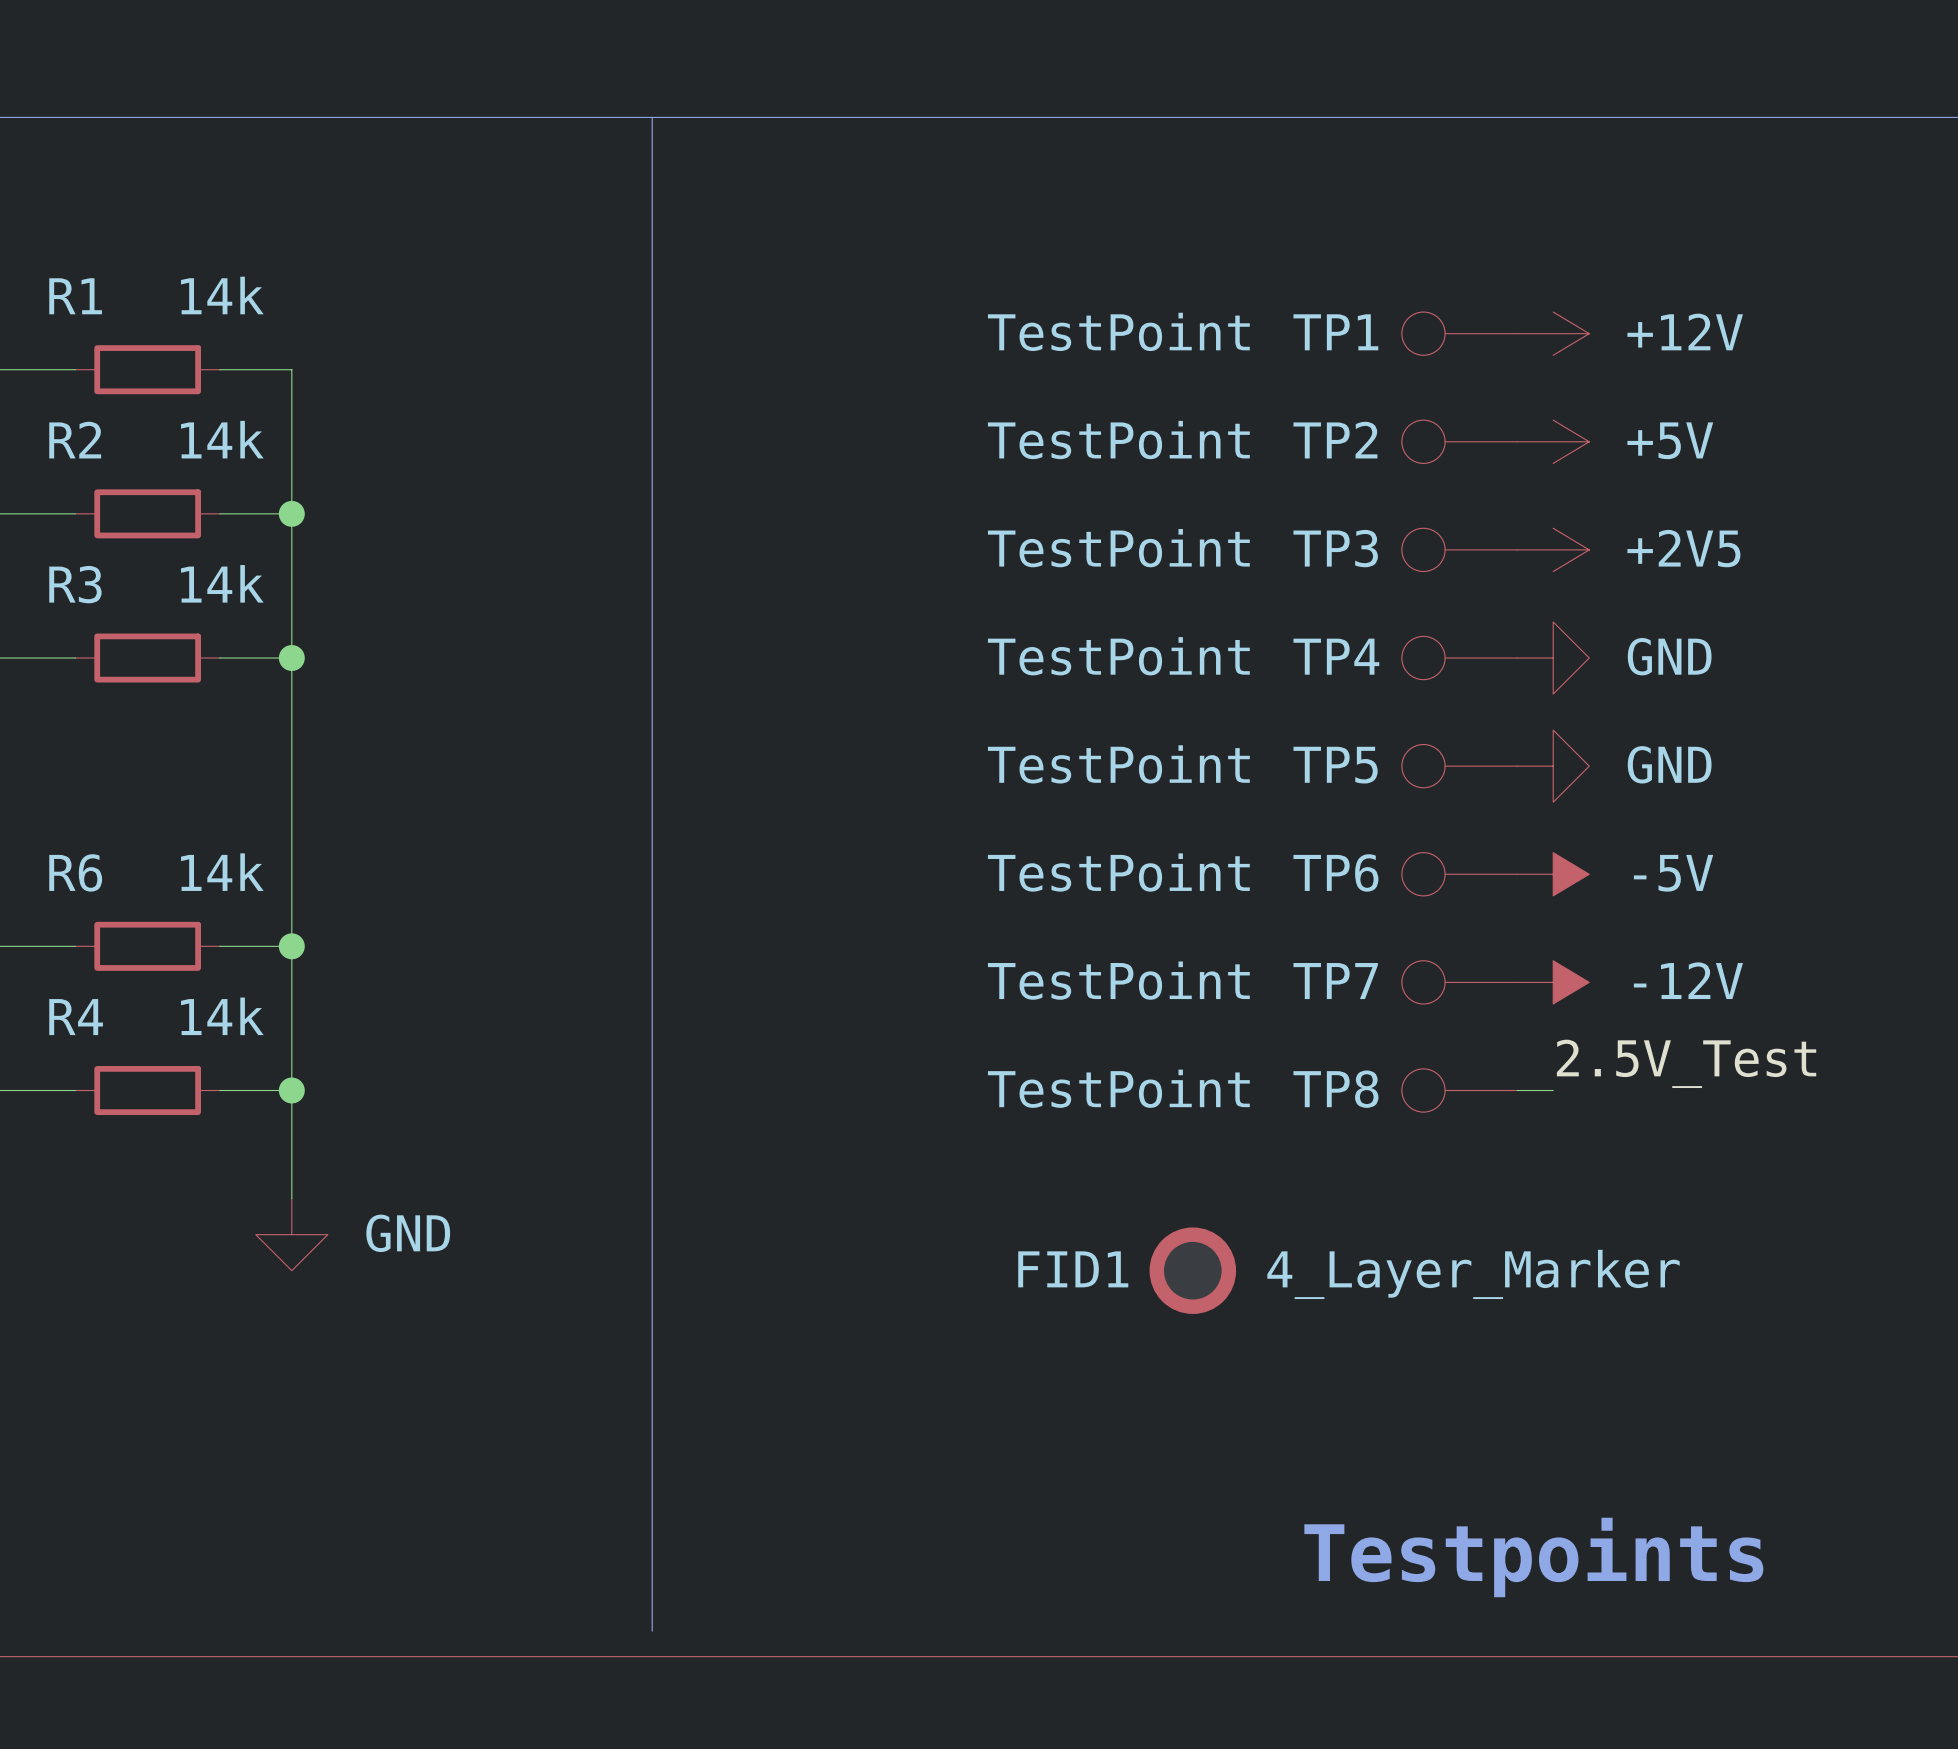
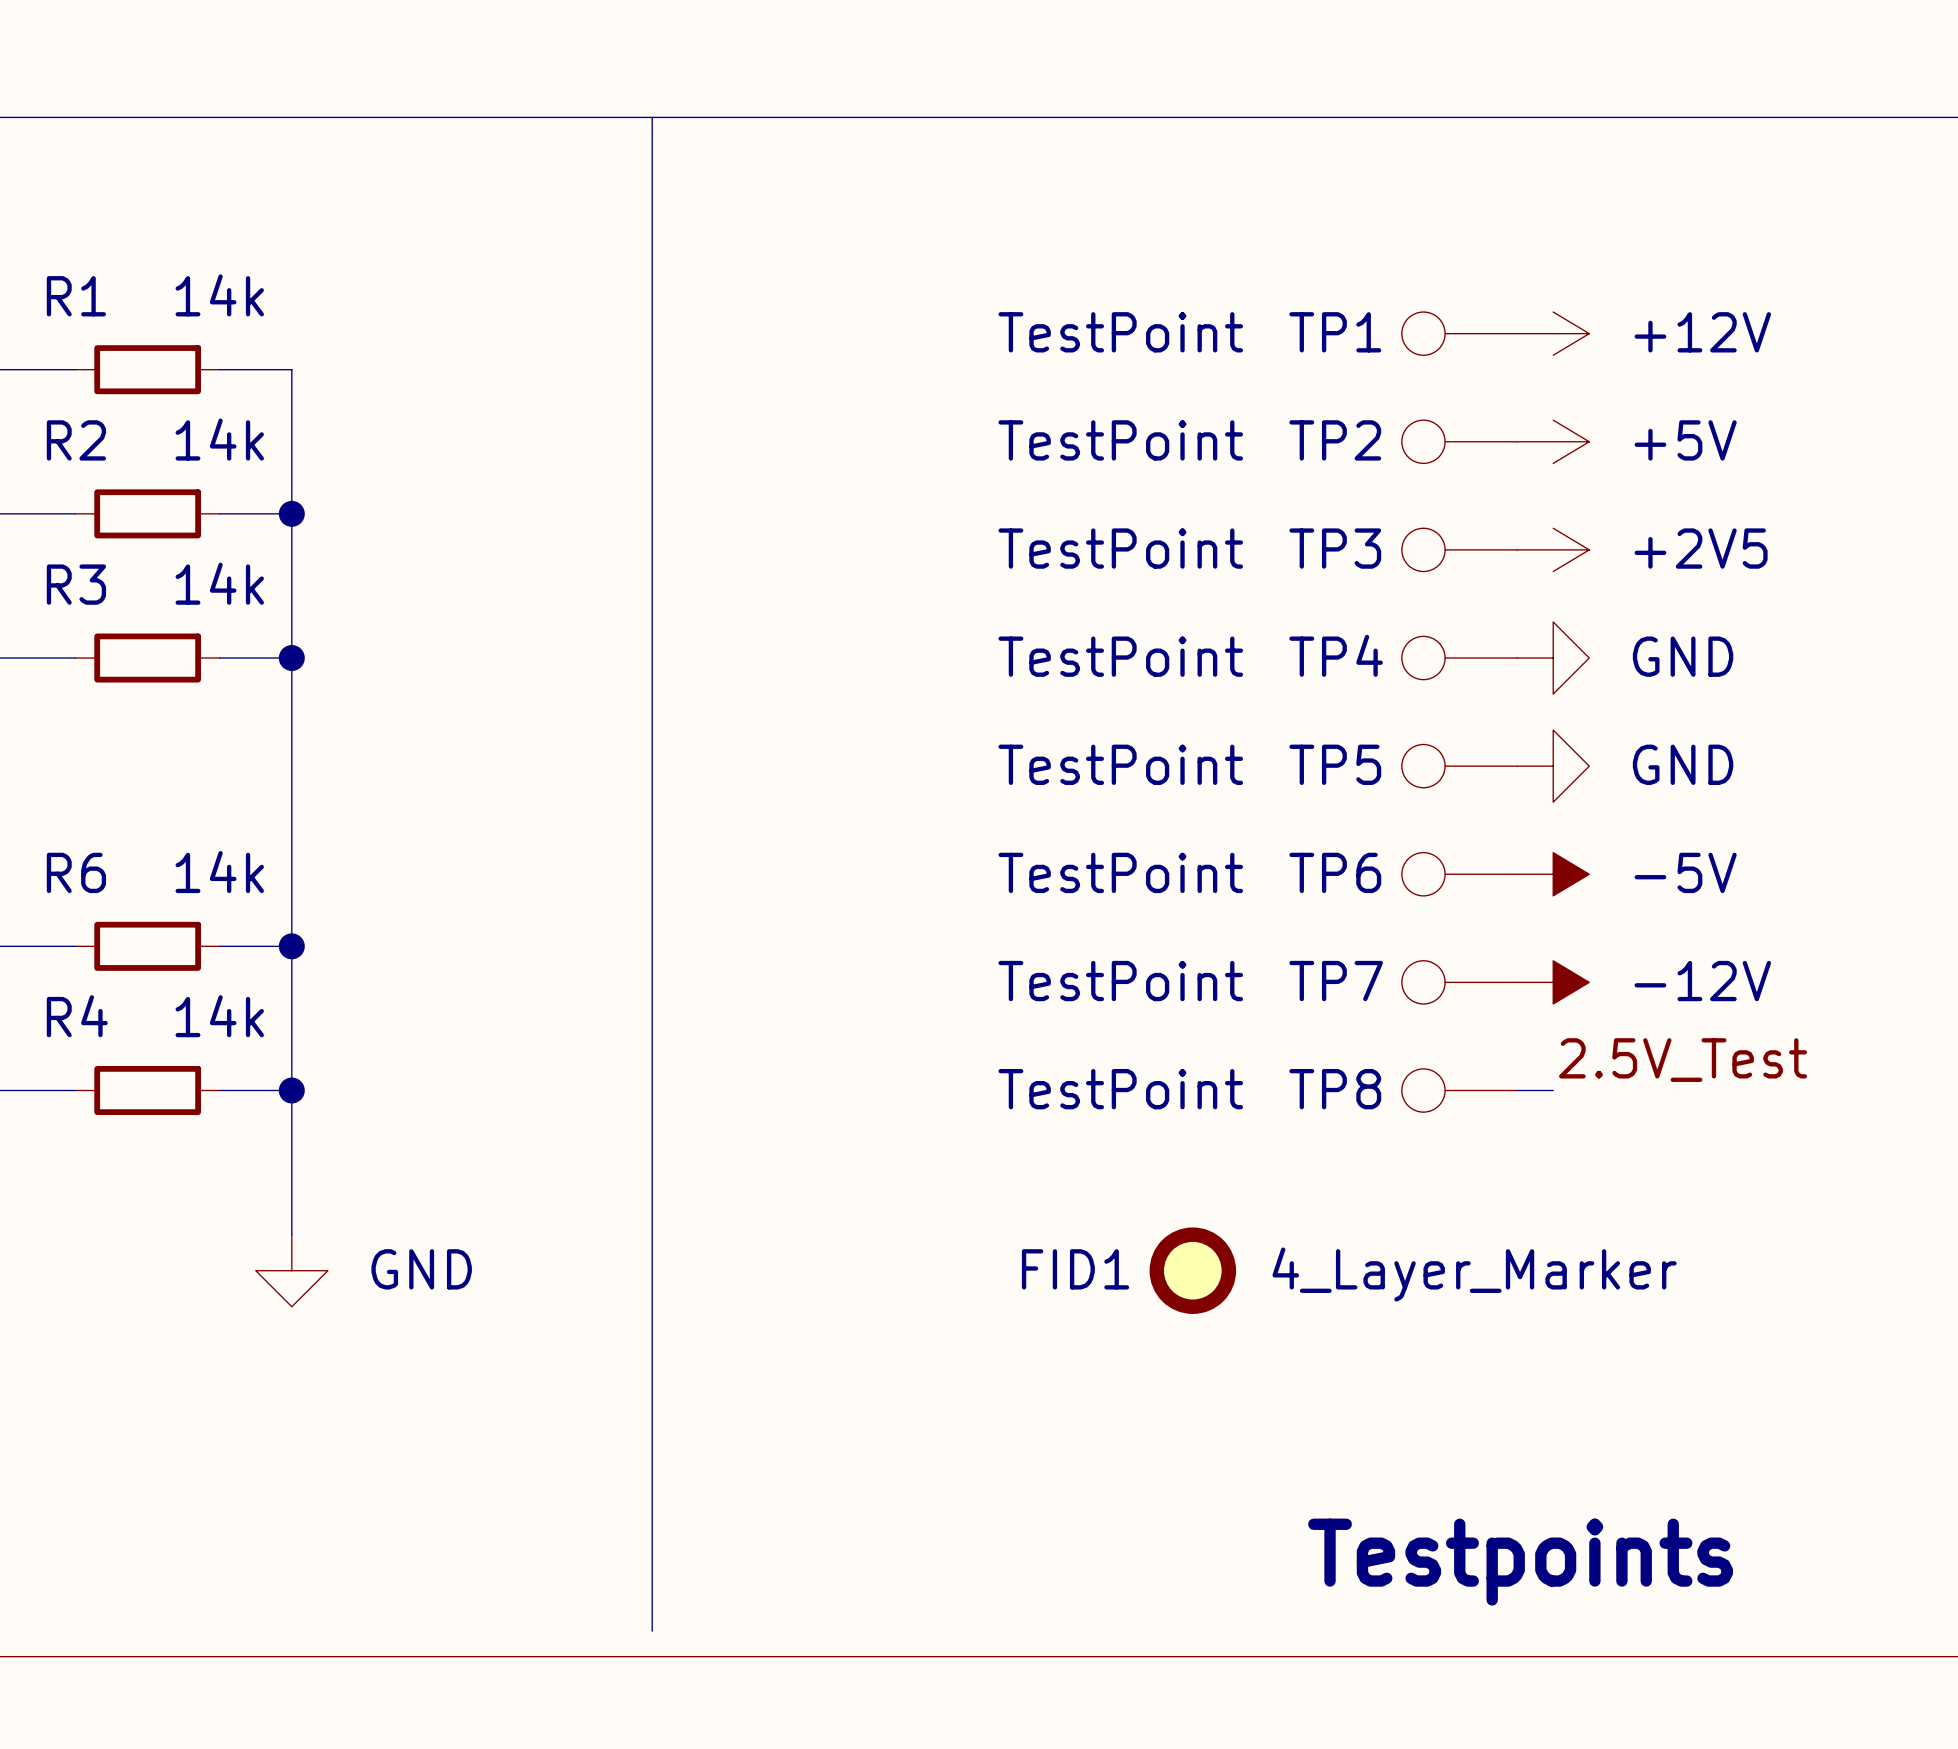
power symbol position: GND (291, 1234) -> GND (291, 1270)

